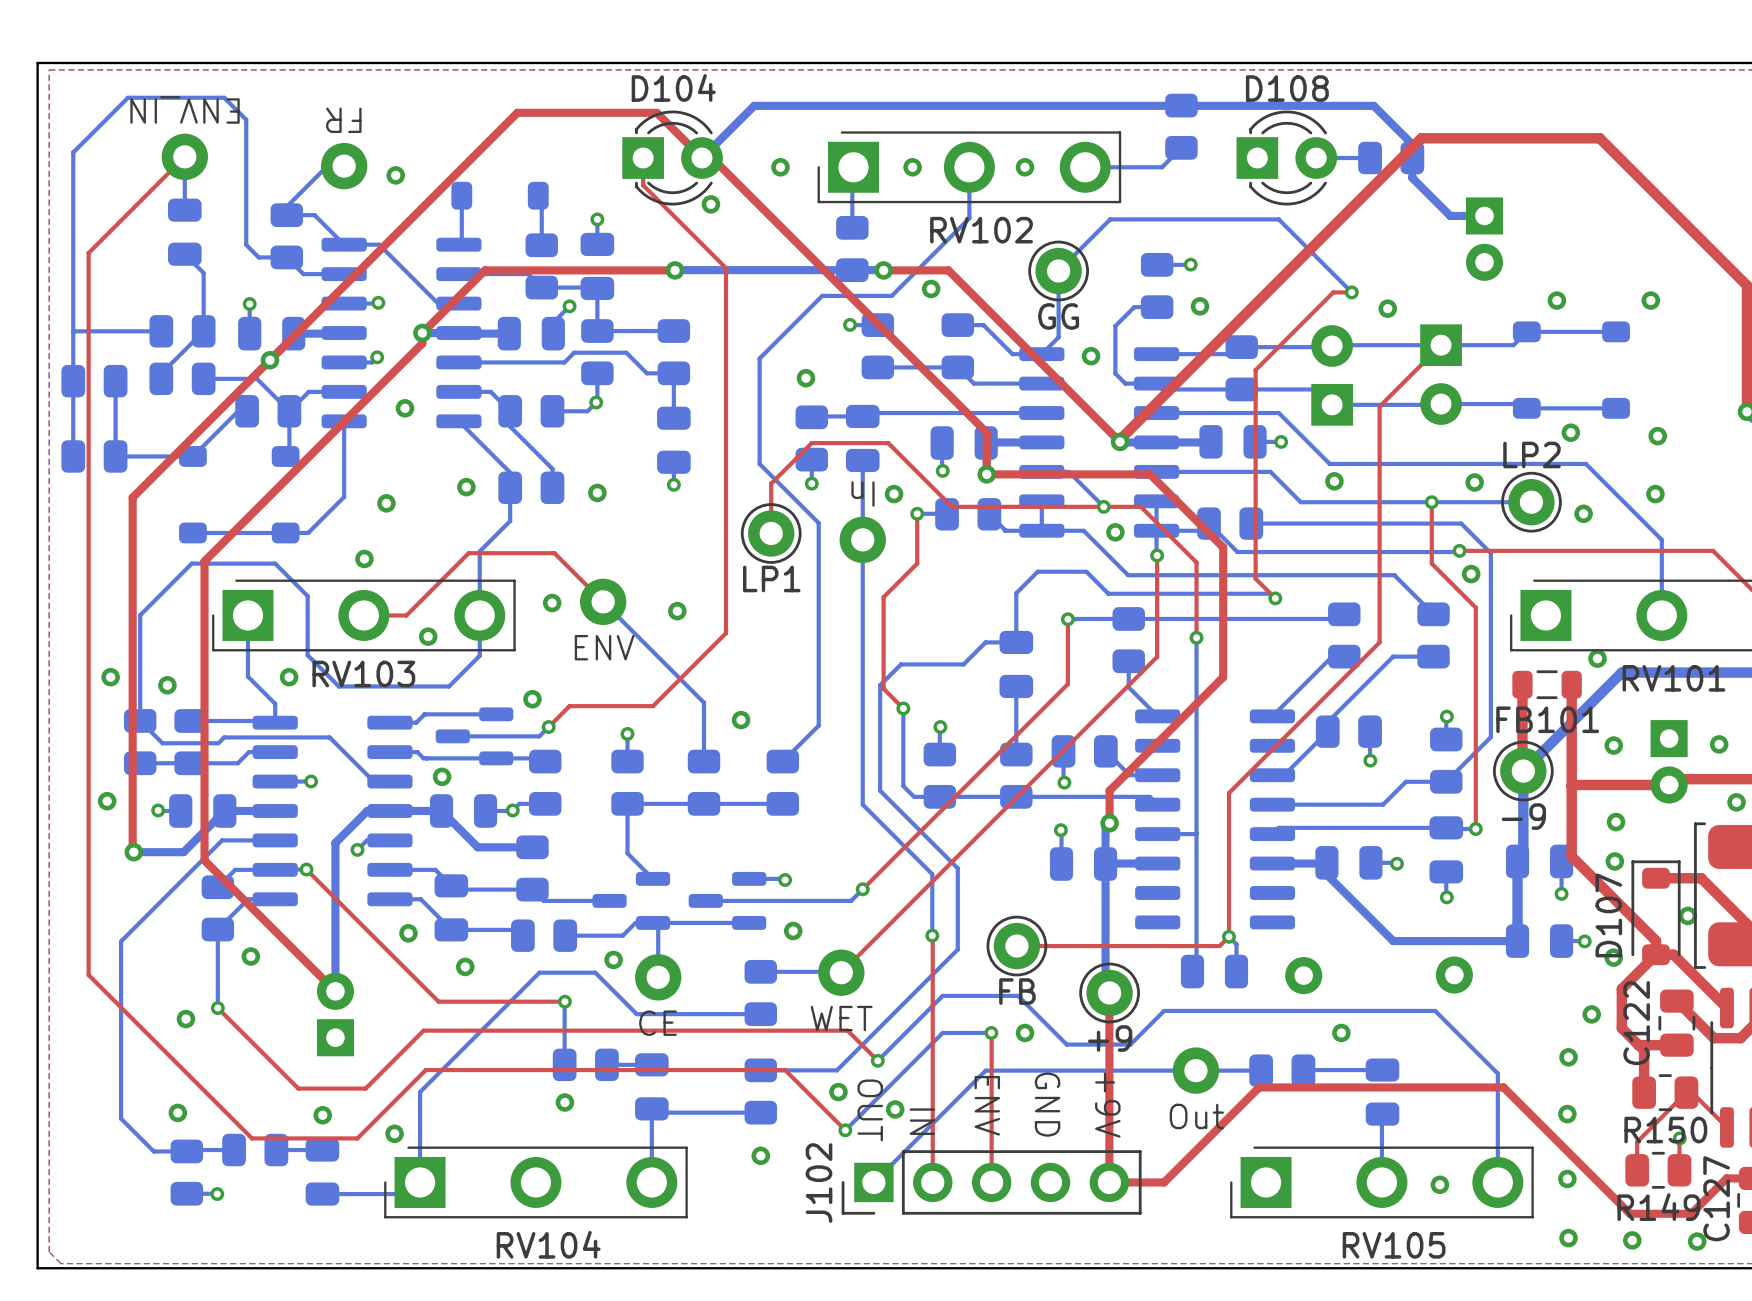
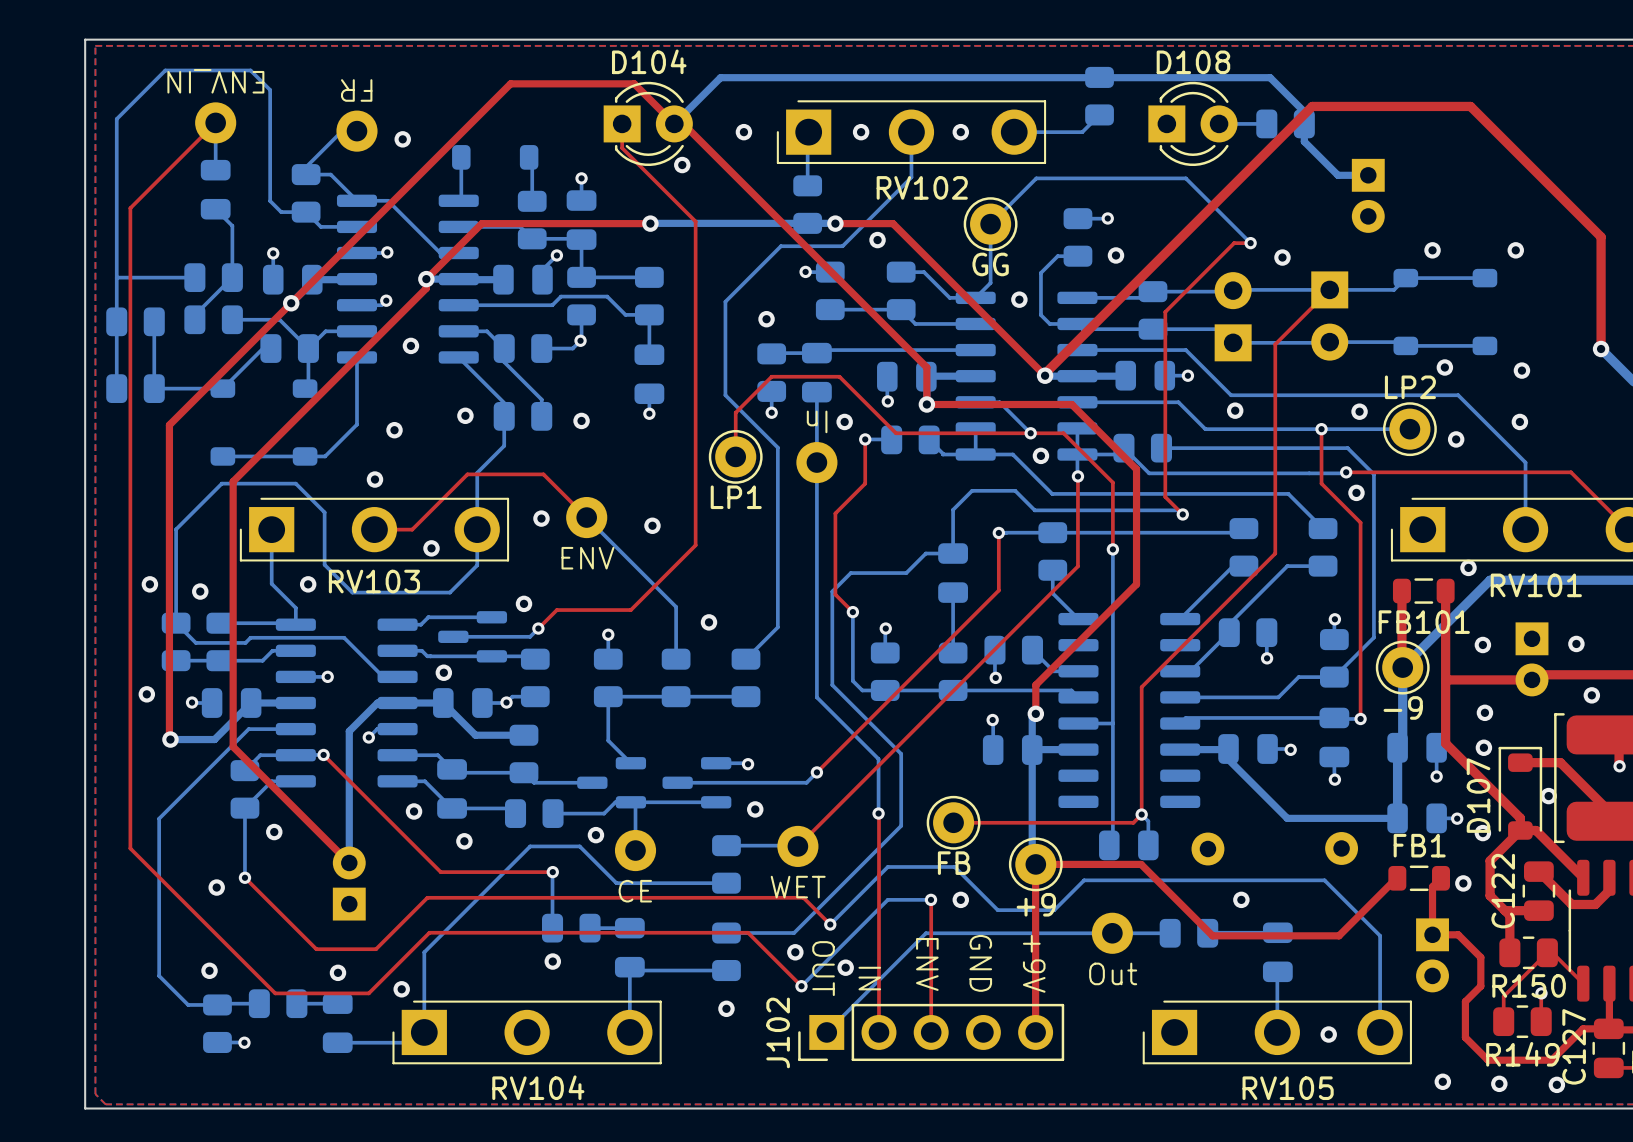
top track: none -> (1035, 864) (1141, 864) (1212, 935) (1339, 935) (1397, 878)
FB1: none -> (1419, 878)
via: (1568, 1057) -> none
part: none -> (1432, 955)
via: (1567, 1114) -> none
via: (1567, 1178) -> none
top track: (1109, 1182) (1164, 1182) (1259, 1087) (1503, 1087) (1629, 1213) -> (1441, 878) (1432, 886) (1432, 934) (1458, 934) (1480, 957) (1480, 986) (1465, 1001) (1465, 1037) (1488, 1060) (1497, 1060)

